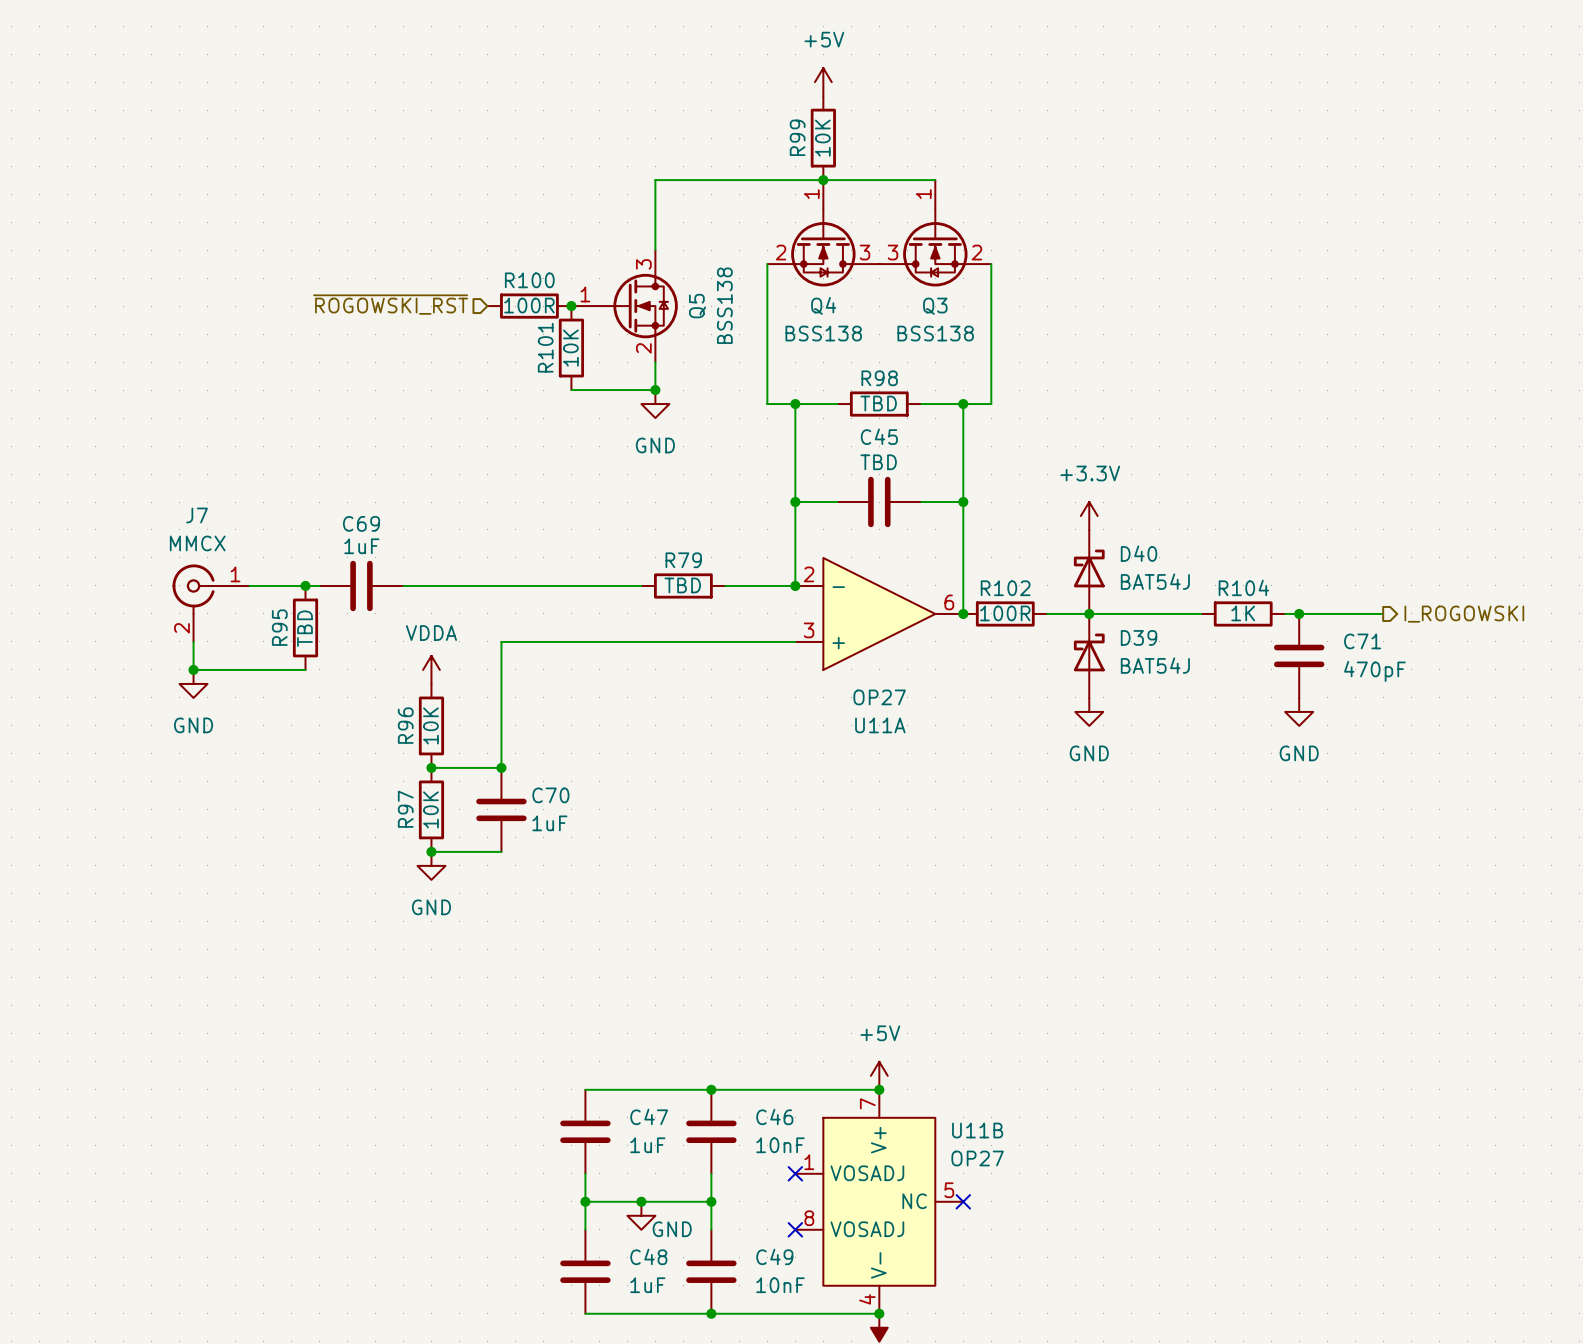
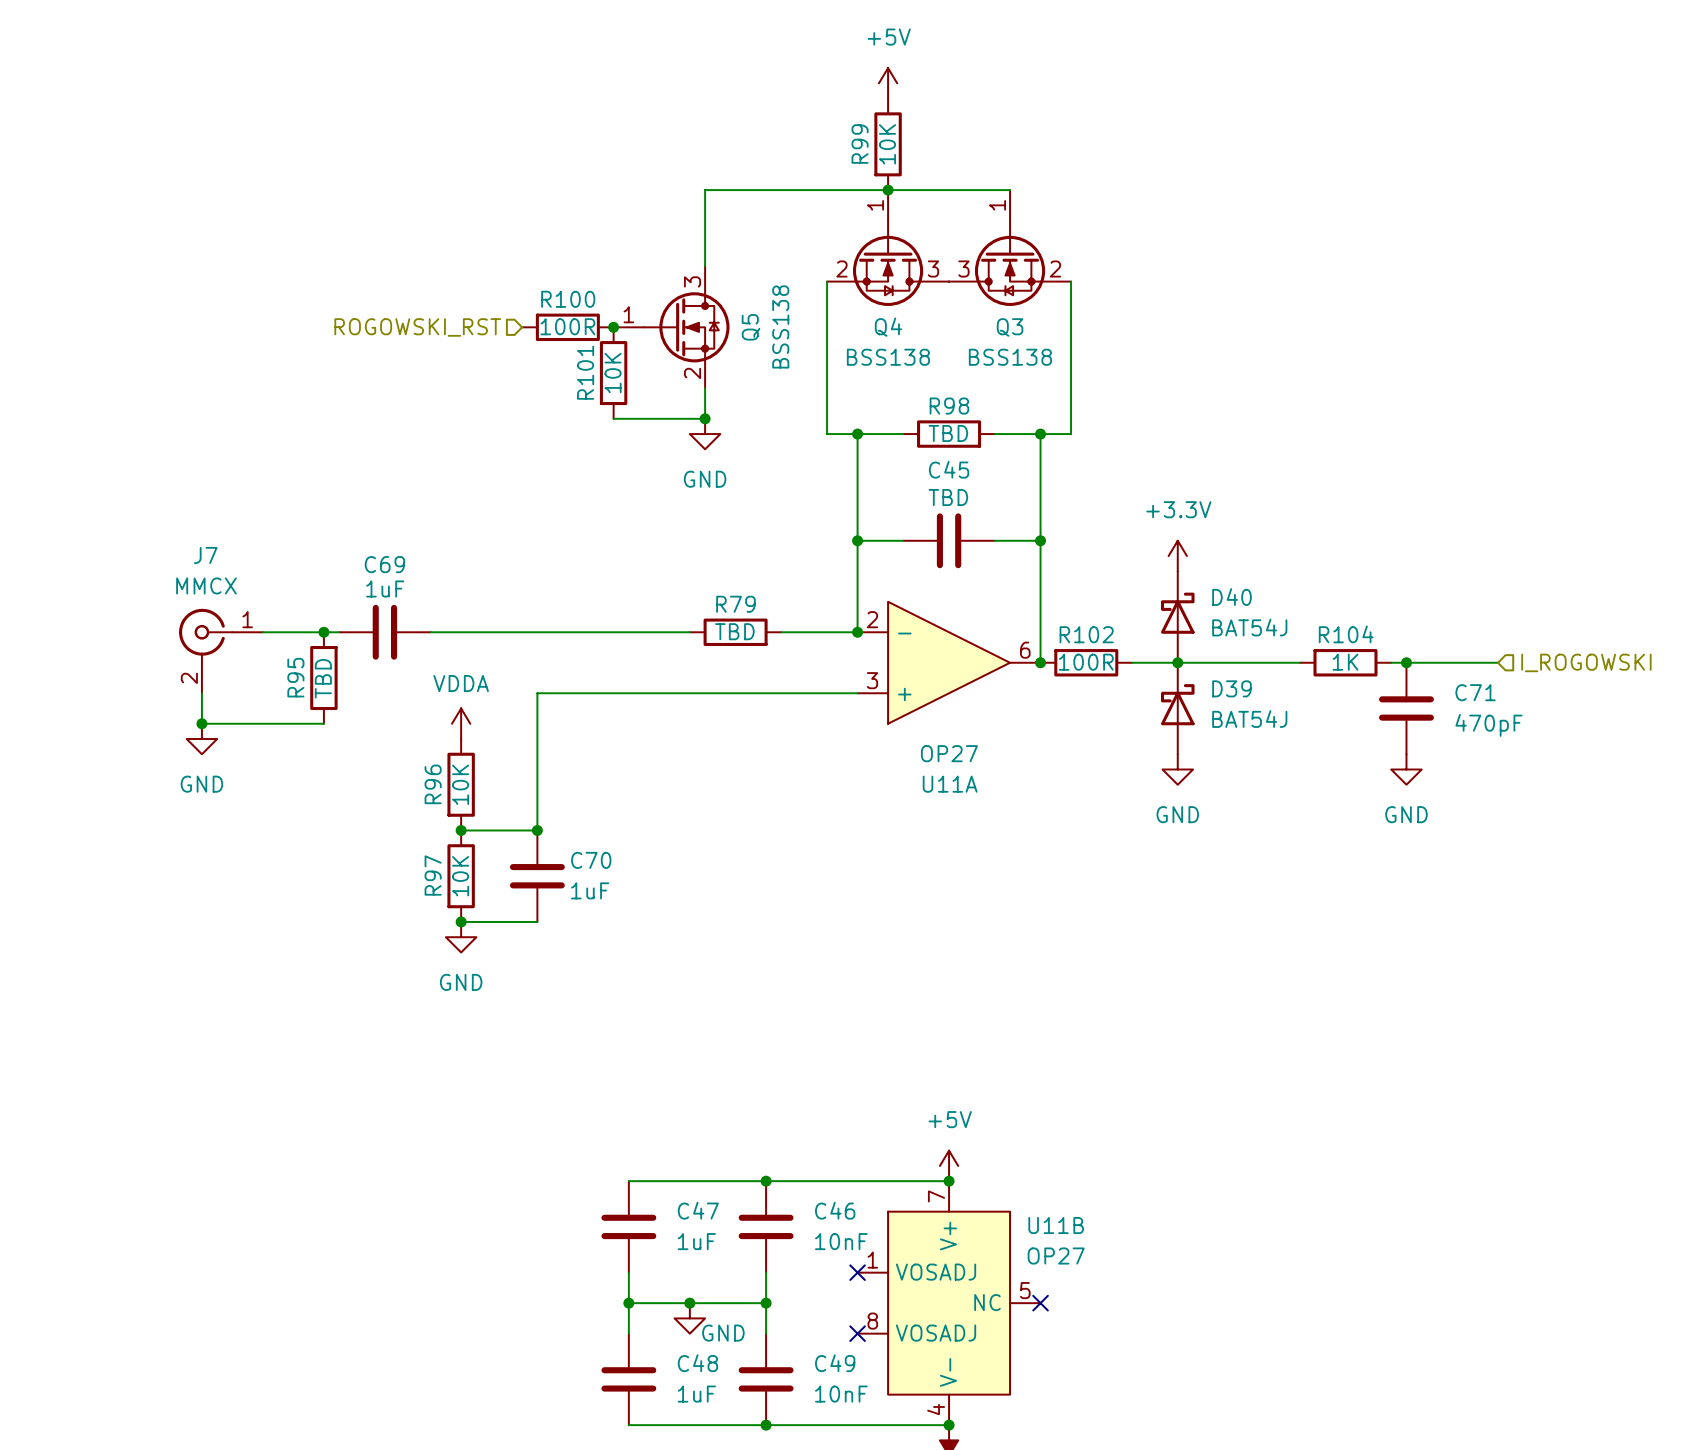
hierarchical label: ~{ROGOWSKI_RST} (390, 304) -> ROGOWSKI_RST (417, 327)
hierarchical label shape: output (1464, 614) -> input (1586, 662)

